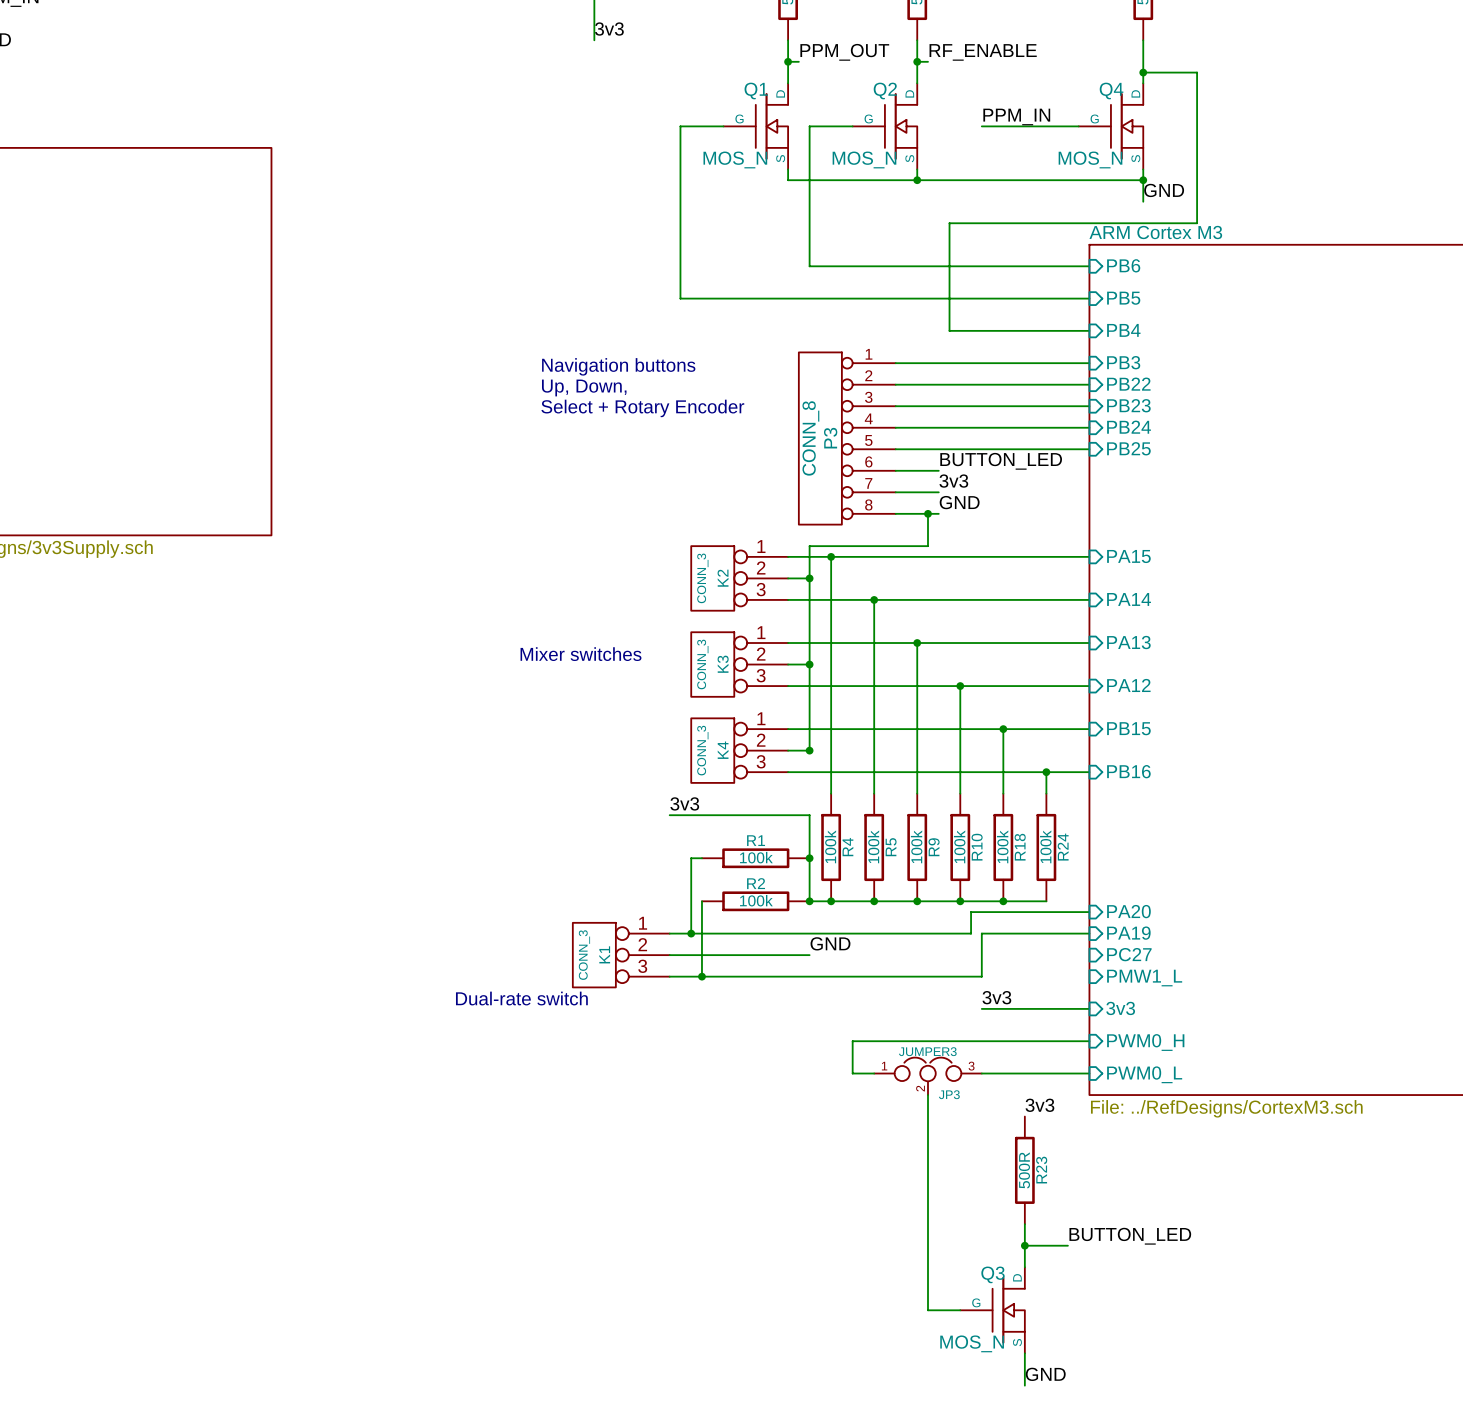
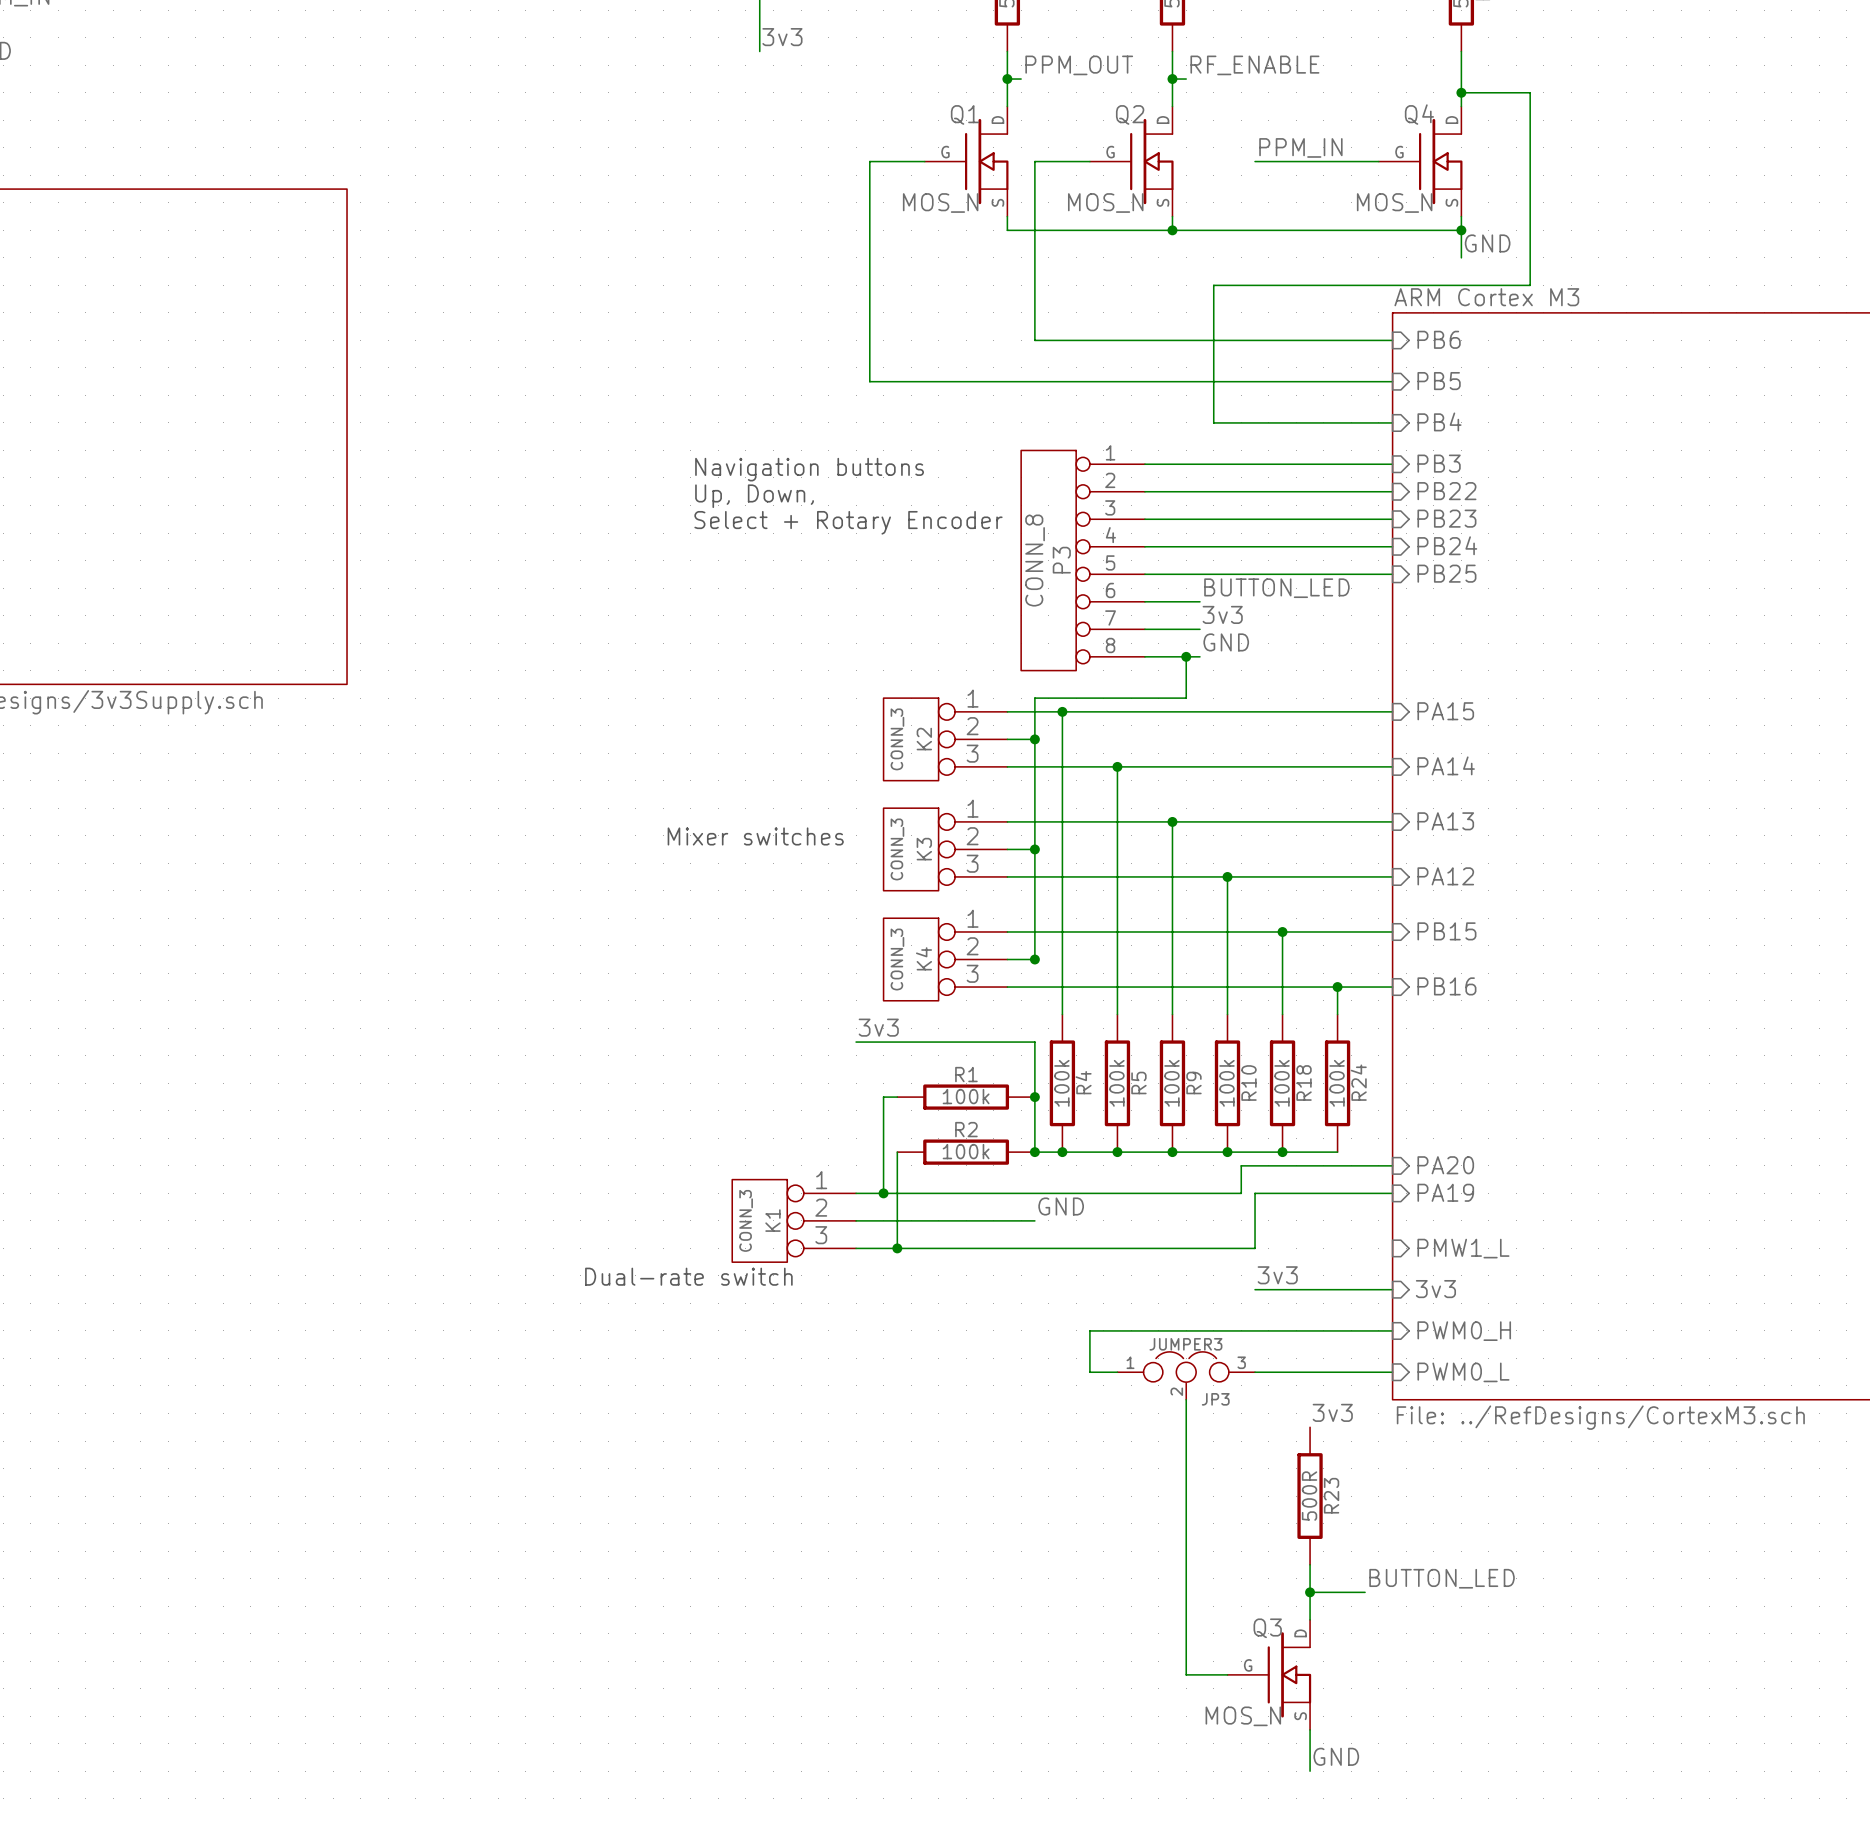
sheet pin: PC27 (1129, 954) -> none

